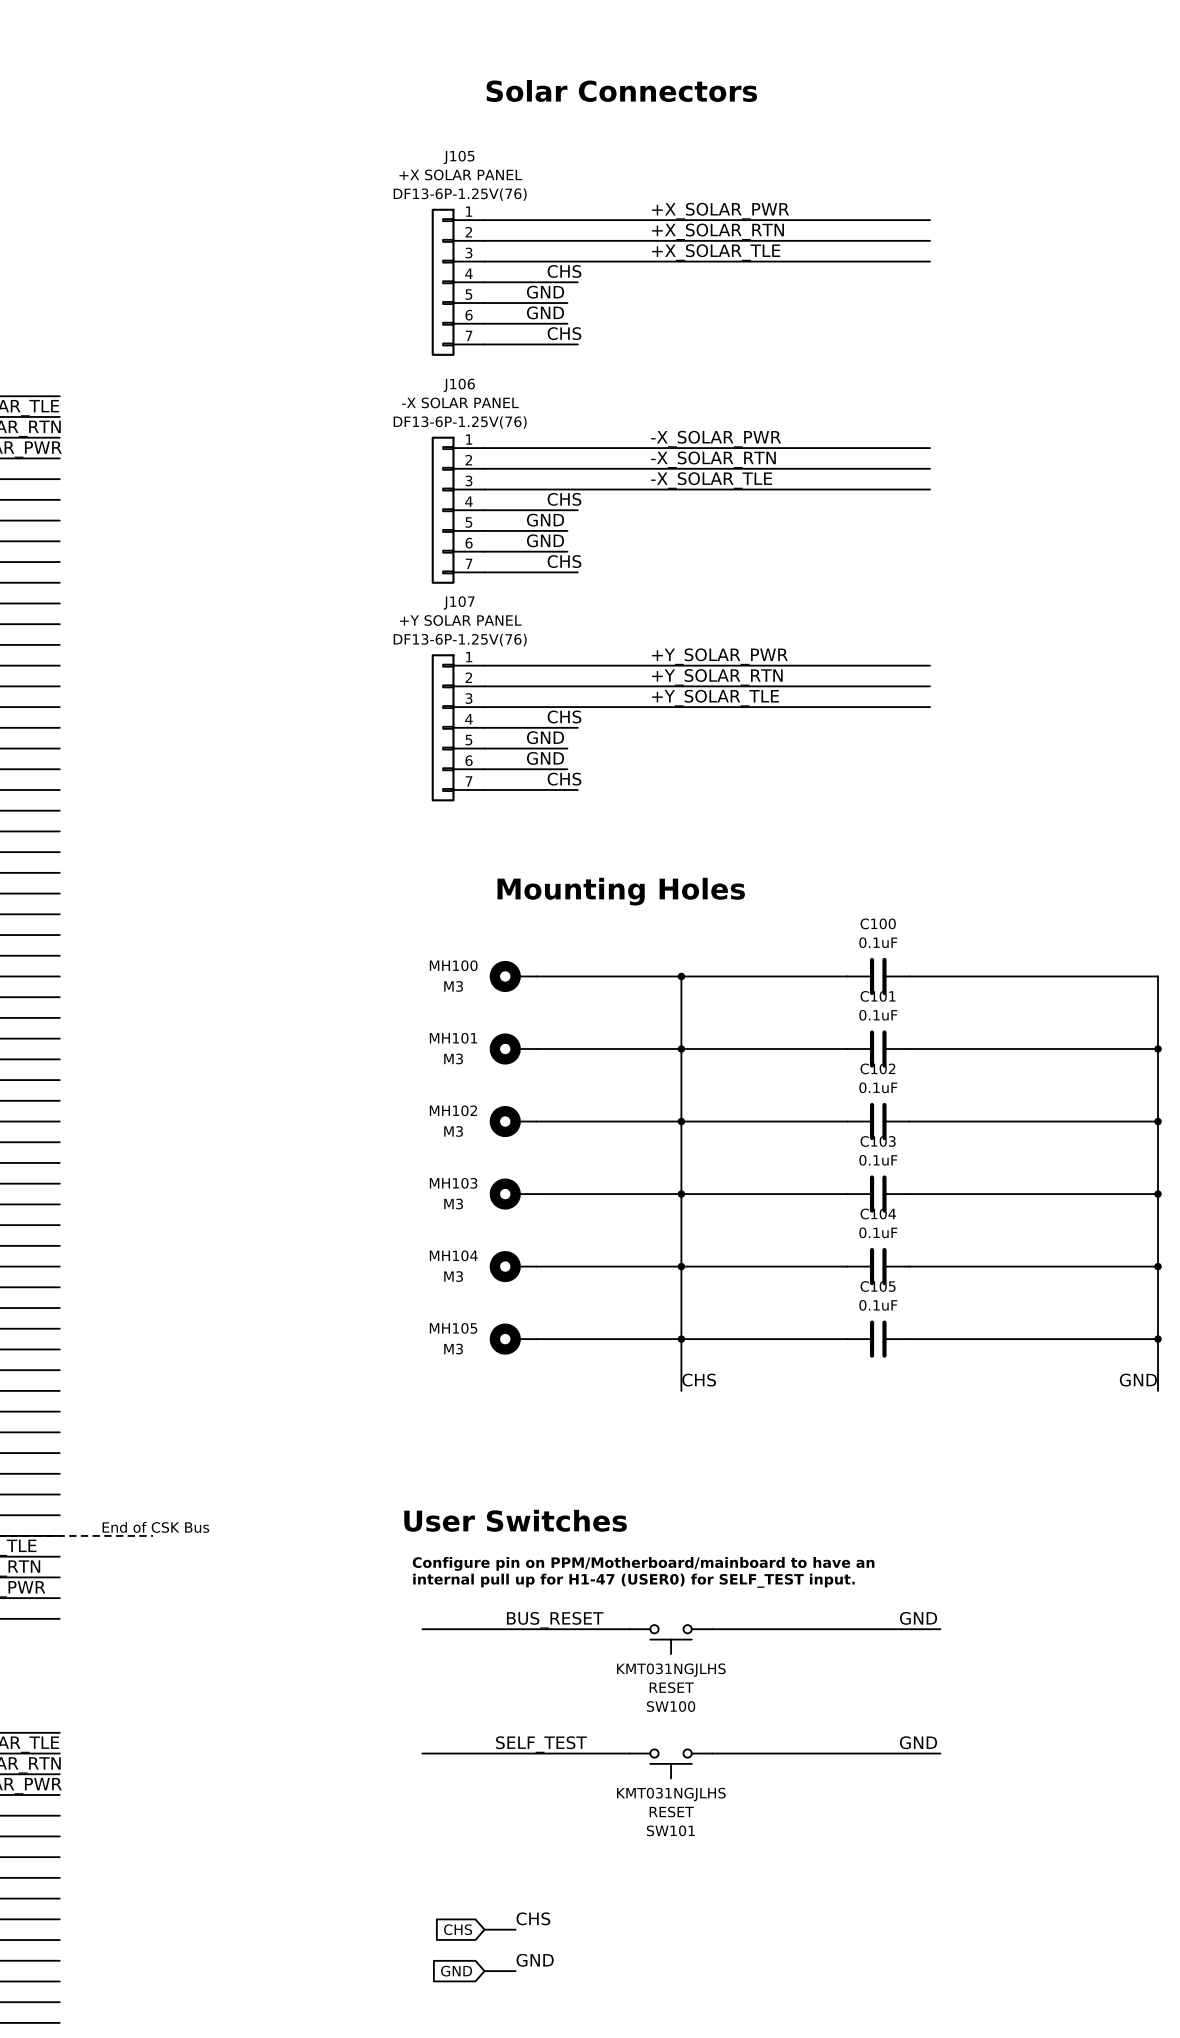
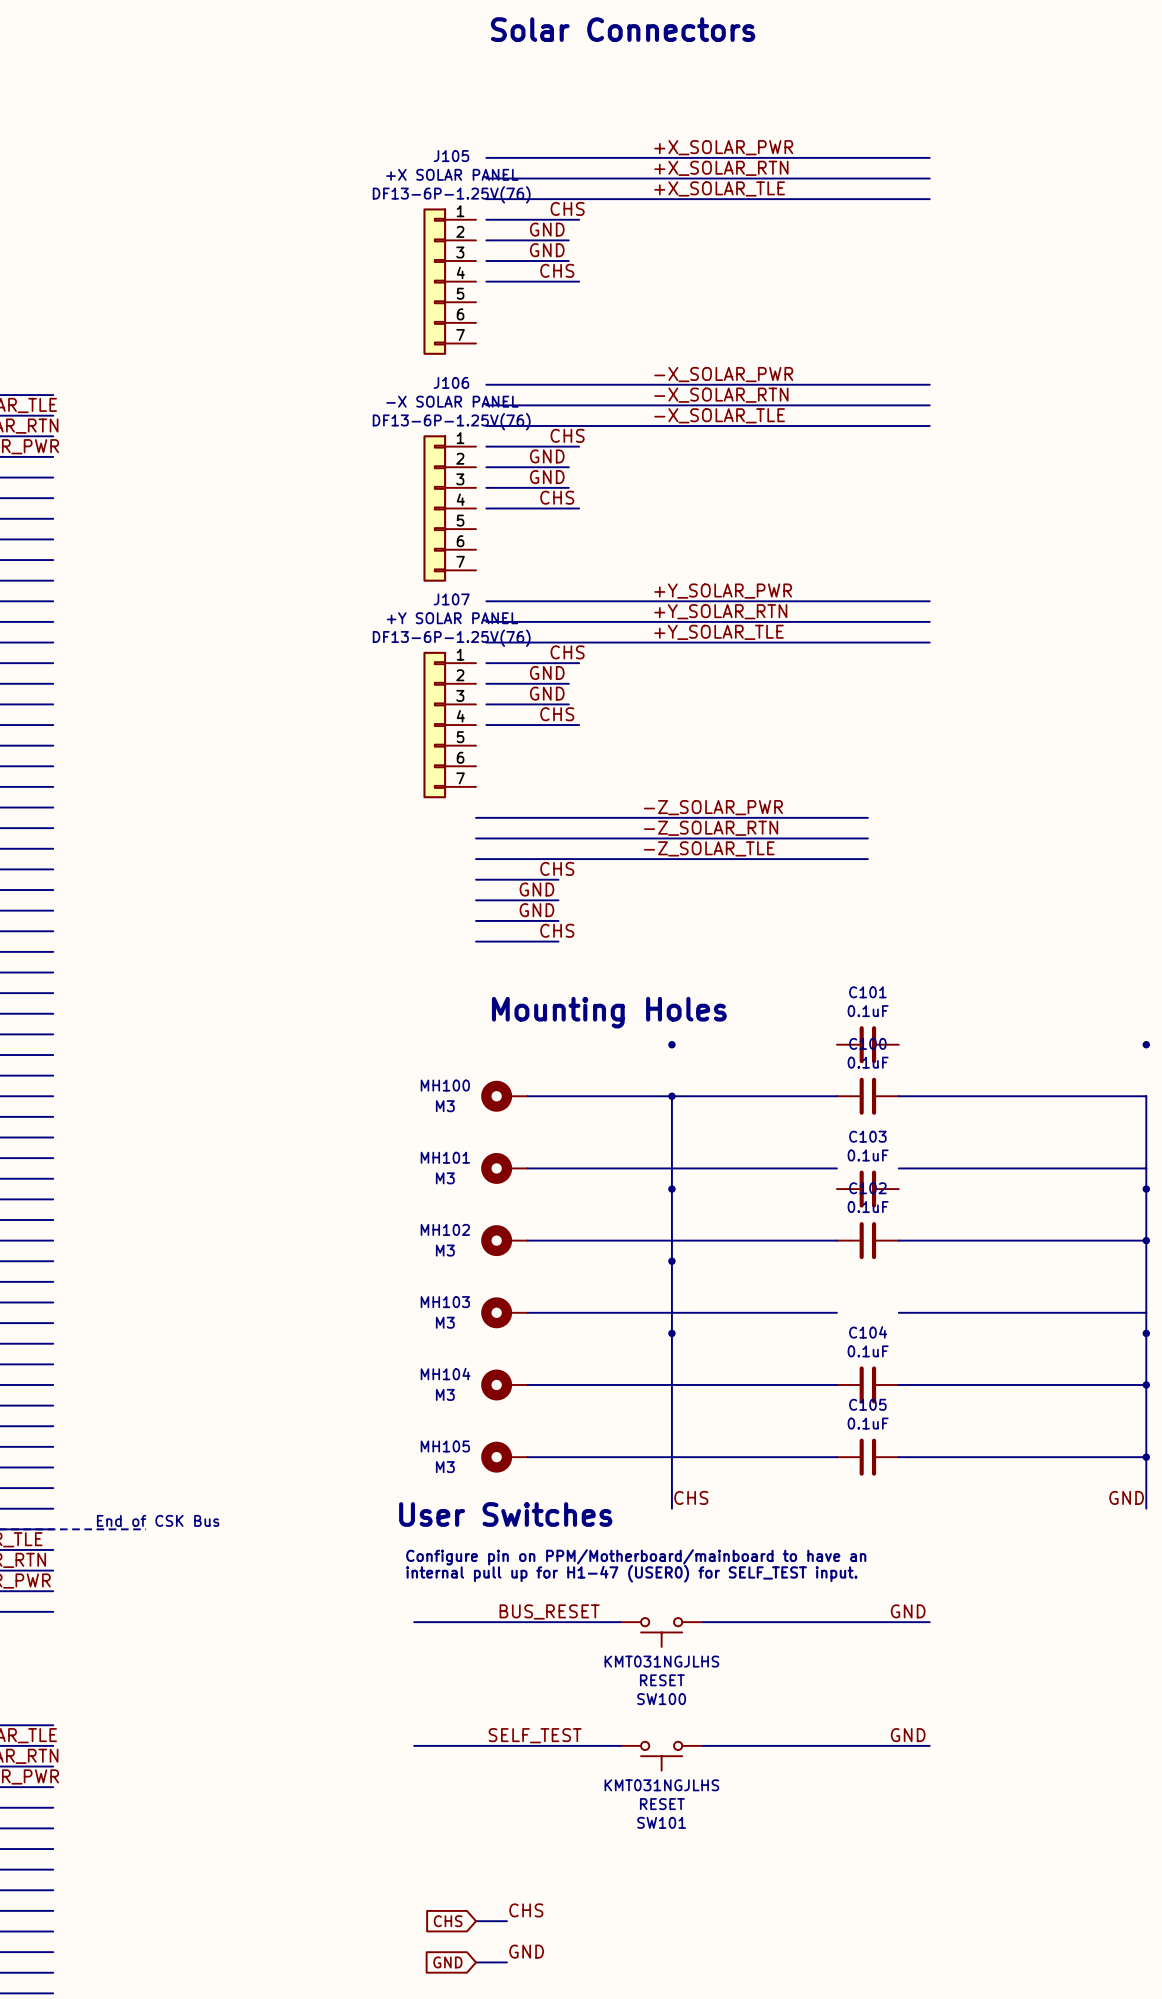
text position: Solar Connectors (621, 90) -> Solar Connectors (623, 29)
wire: none -> (486, 157) (929, 157)
wire: none -> (486, 178) (929, 178)
wire: none -> (486, 199) (929, 199)
label: none -> CHS (567, 208)
label position: +X_SOLAR_PWR (720, 211) -> +X_SOLAR_PWR (723, 147)
wire: (484, 220) (494, 220) -> none
wire: (588, 220) (930, 220) -> none
label: none -> GND (547, 229)
label position: +X_SOLAR_RTN (718, 231) -> +X_SOLAR_RTN (721, 168)
wire: (484, 240) (494, 240) -> none
wire: (577, 240) (930, 240) -> none
label: none -> GND (547, 250)
label position: +X_SOLAR_TLE (716, 252) -> +X_SOLAR_TLE (719, 188)
wire: (484, 261) (494, 261) -> none
wire: (577, 261) (930, 261) -> none
wire: (484, 282) (494, 282) -> (568, 281) (579, 281)
label: GND (545, 292) -> none
wire: (484, 303) (567, 303) -> none
label: GND (545, 312) -> none
wire: (484, 323) (567, 323) -> none
label: CHS (564, 333) -> none
wire: (484, 344) (577, 344) -> none
wire: none -> (486, 384) (929, 384)
wire: none -> (486, 405) (929, 405)
wire: none -> (486, 425) (929, 425)
label: none -> CHS (567, 435)
label position: -X_SOLAR_PWR (716, 439) -> -X_SOLAR_PWR (723, 374)
wire: (484, 448) (494, 448) -> none
wire: (588, 448) (930, 448) -> none
label: none -> GND (547, 456)
label position: -X_SOLAR_RTN (713, 459) -> -X_SOLAR_RTN (721, 395)
wire: (484, 468) (494, 468) -> none
wire: (577, 468) (930, 468) -> none
label: none -> GND (547, 477)
label position: -X_SOLAR_TLE (711, 480) -> -X_SOLAR_TLE (719, 415)
wire: (484, 489) (494, 489) -> none
wire: (577, 489) (930, 489) -> none
wire: (484, 510) (494, 510) -> (568, 508) (579, 508)
label: GND (545, 520) -> none
wire: (484, 530) (567, 530) -> none
label: GND (545, 540) -> none
wire: (484, 551) (567, 551) -> none
label: CHS (564, 561) -> none
wire: (484, 572) (577, 572) -> none
wire: none -> (486, 601) (929, 601)
wire: none -> (486, 621) (929, 621)
wire: none -> (486, 642) (929, 642)
label: none -> CHS (567, 652)
label position: +Y_SOLAR_PWR (719, 656) -> +Y_SOLAR_PWR (723, 591)
wire: (484, 665) (494, 665) -> none
wire: (588, 665) (930, 665) -> none
label: none -> GND (547, 672)
label position: +Y_SOLAR_RTN (717, 677) -> +Y_SOLAR_RTN (720, 611)
wire: (484, 686) (494, 686) -> none
wire: (577, 686) (930, 686) -> none
label: none -> GND (547, 693)
label position: +Y_SOLAR_TLE (715, 698) -> +Y_SOLAR_TLE (719, 632)
wire: (484, 707) (494, 707) -> none
wire: (577, 707) (930, 707) -> none
wire: (484, 727) (494, 727) -> (568, 725) (579, 725)
label: GND (545, 737) -> none
wire: (484, 748) (567, 748) -> (476, 941) (558, 941)
label: GND (545, 758) -> none
wire: (484, 769) (567, 769) -> (476, 900) (558, 900)
label: CHS (564, 779) -> none
wire: (484, 789) (577, 789) -> none
label: none -> -Z_SOLAR_PWR (713, 807)
wire: none -> (476, 817) (867, 817)
label: none -> -Z_SOLAR_RTN (711, 828)
wire: none -> (476, 838) (867, 838)
label: none -> -Z_SOLAR_TLE (709, 848)
wire: none -> (476, 859) (867, 859)
label: none -> CHS (557, 868)
wire: none -> (476, 879) (558, 879)
text position: Mounting Holes (621, 891) -> Mounting Holes (609, 1012)
label: none -> GND (536, 889)
label: none -> GND (536, 910)
wire: none -> (476, 920) (558, 920)
label: none -> CHS (557, 930)
MH100 position: (513, 976) -> (504, 1096)
wire: (536, 976) (847, 976) -> (527, 1096) (836, 1096)
wire: (681, 976) (681, 1100) -> none
junction: (681, 976) -> none
C100 position: (878, 976) -> (867, 1096)
wire: (909, 976) (1158, 976) (1158, 1100) -> (898, 1096) (1146, 1096)
MH101 position: (513, 1049) -> (504, 1168)
wire: (536, 1049) (847, 1049) -> (527, 1168) (836, 1168)
wire: (909, 1049) (1158, 1049) -> (898, 1168) (1146, 1168)
MH102 position: (513, 1121) -> (504, 1240)
wire: (536, 1121) (847, 1121) -> (527, 1240) (836, 1240)
junction position: (681, 1121) -> (671, 1096)
C102 position: (878, 1121) -> (867, 1240)
wire: (909, 1121) (1158, 1121) -> (898, 1240) (1146, 1240)
junction: (1158, 1121) -> none
MH103 position: (513, 1194) -> (504, 1312)
wire: (536, 1194) (847, 1194) -> (527, 1312) (836, 1312)
wire: (909, 1194) (1158, 1194) -> (898, 1312) (1146, 1312)
MH104 position: (513, 1266) -> (504, 1384)
wire: (536, 1266) (847, 1266) -> (527, 1384) (836, 1384)
C104 position: (878, 1266) -> (867, 1384)
wire: (909, 1266) (1158, 1266) -> none
junction position: (1158, 1266) -> (1146, 1240)
MH105 position: (513, 1339) -> (504, 1457)
wire: (536, 1339) (847, 1339) -> (527, 1457) (836, 1457)
C105 position: (878, 1339) -> (867, 1457)
wire: (909, 1339) (1158, 1339) -> (898, 1457) (1146, 1457)
label position: CHS (699, 1380) -> CHS (691, 1497)
label position: GND (1138, 1380) -> GND (1126, 1497)
wire: none -> (671, 1384) (671, 1508)
wire: none -> (898, 1384) (1146, 1384) (1146, 1508)
junction: none -> (1146, 1384)
junction: none -> (1146, 1457)

